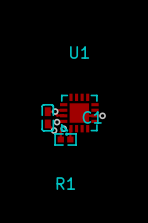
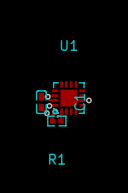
C1 name rotation: 0° (92, 117) -> 90° counterclockwise (79, 102)

